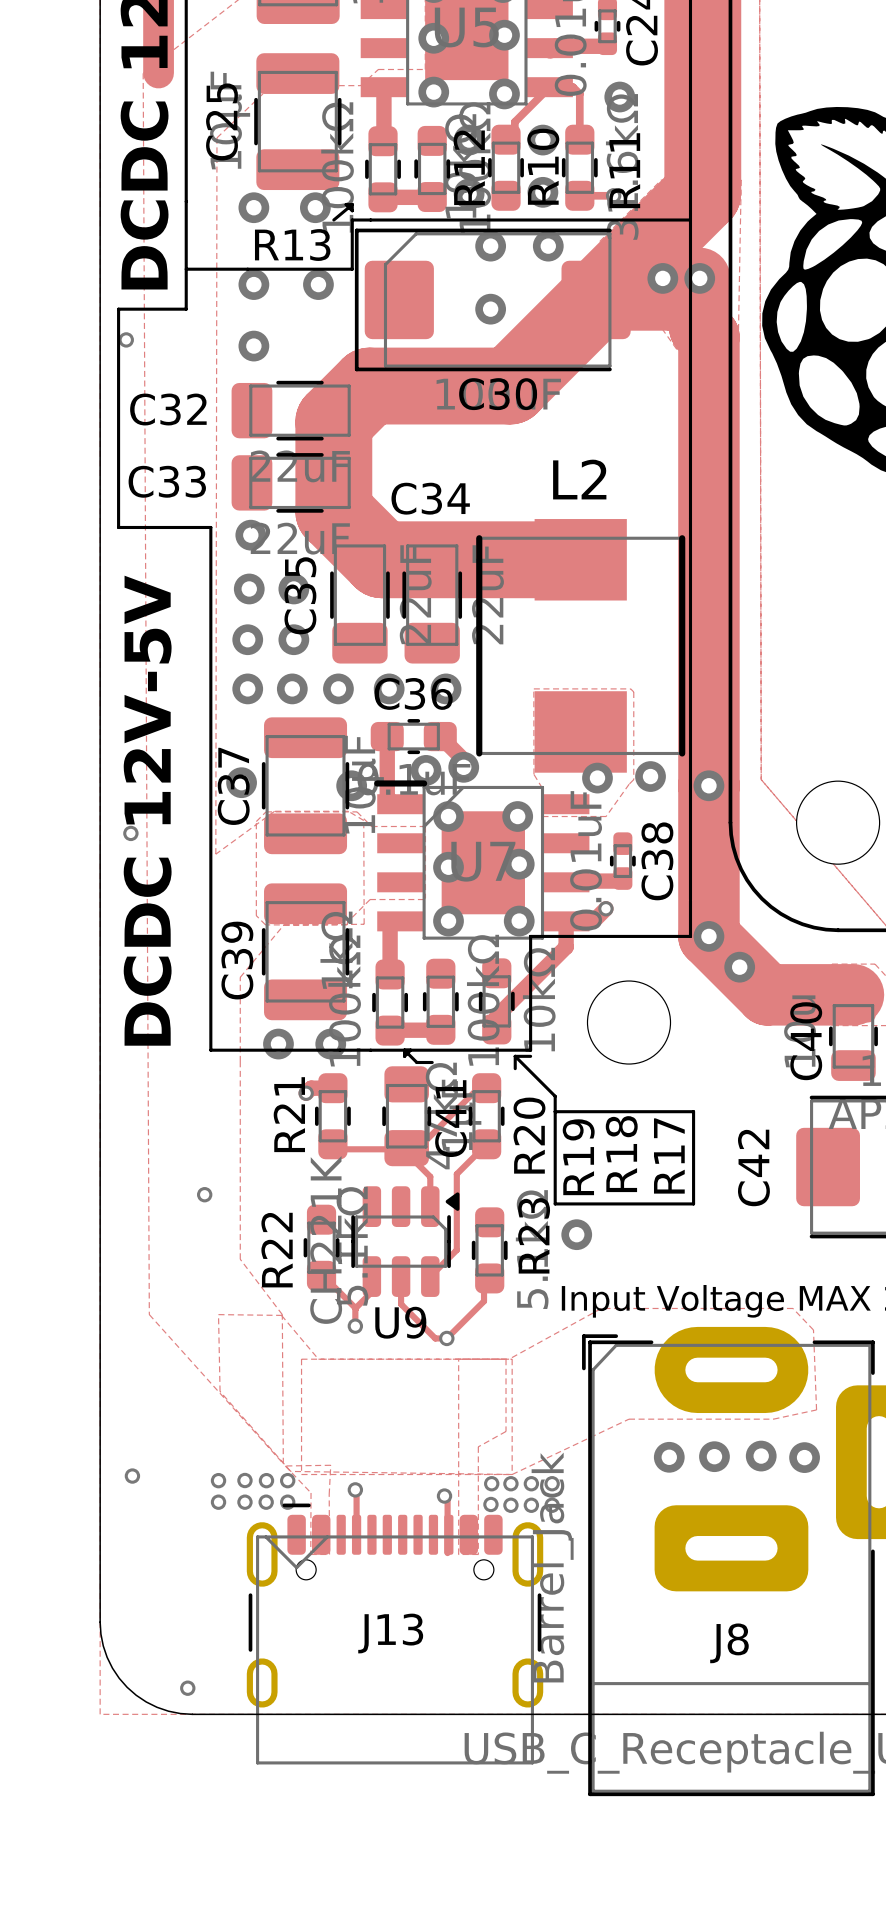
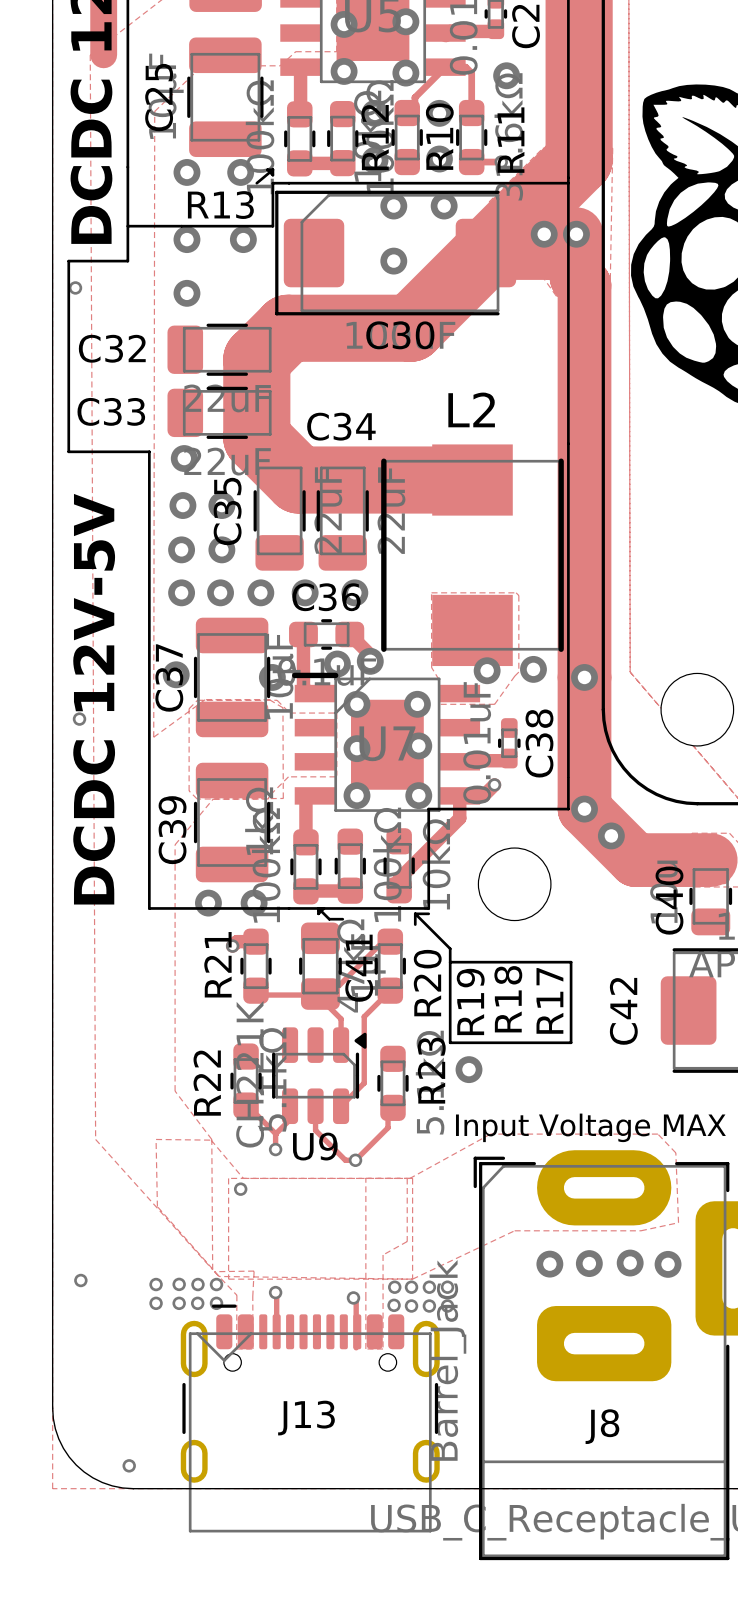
via: (204, 1194) -> none
via: none -> (240, 1189)

